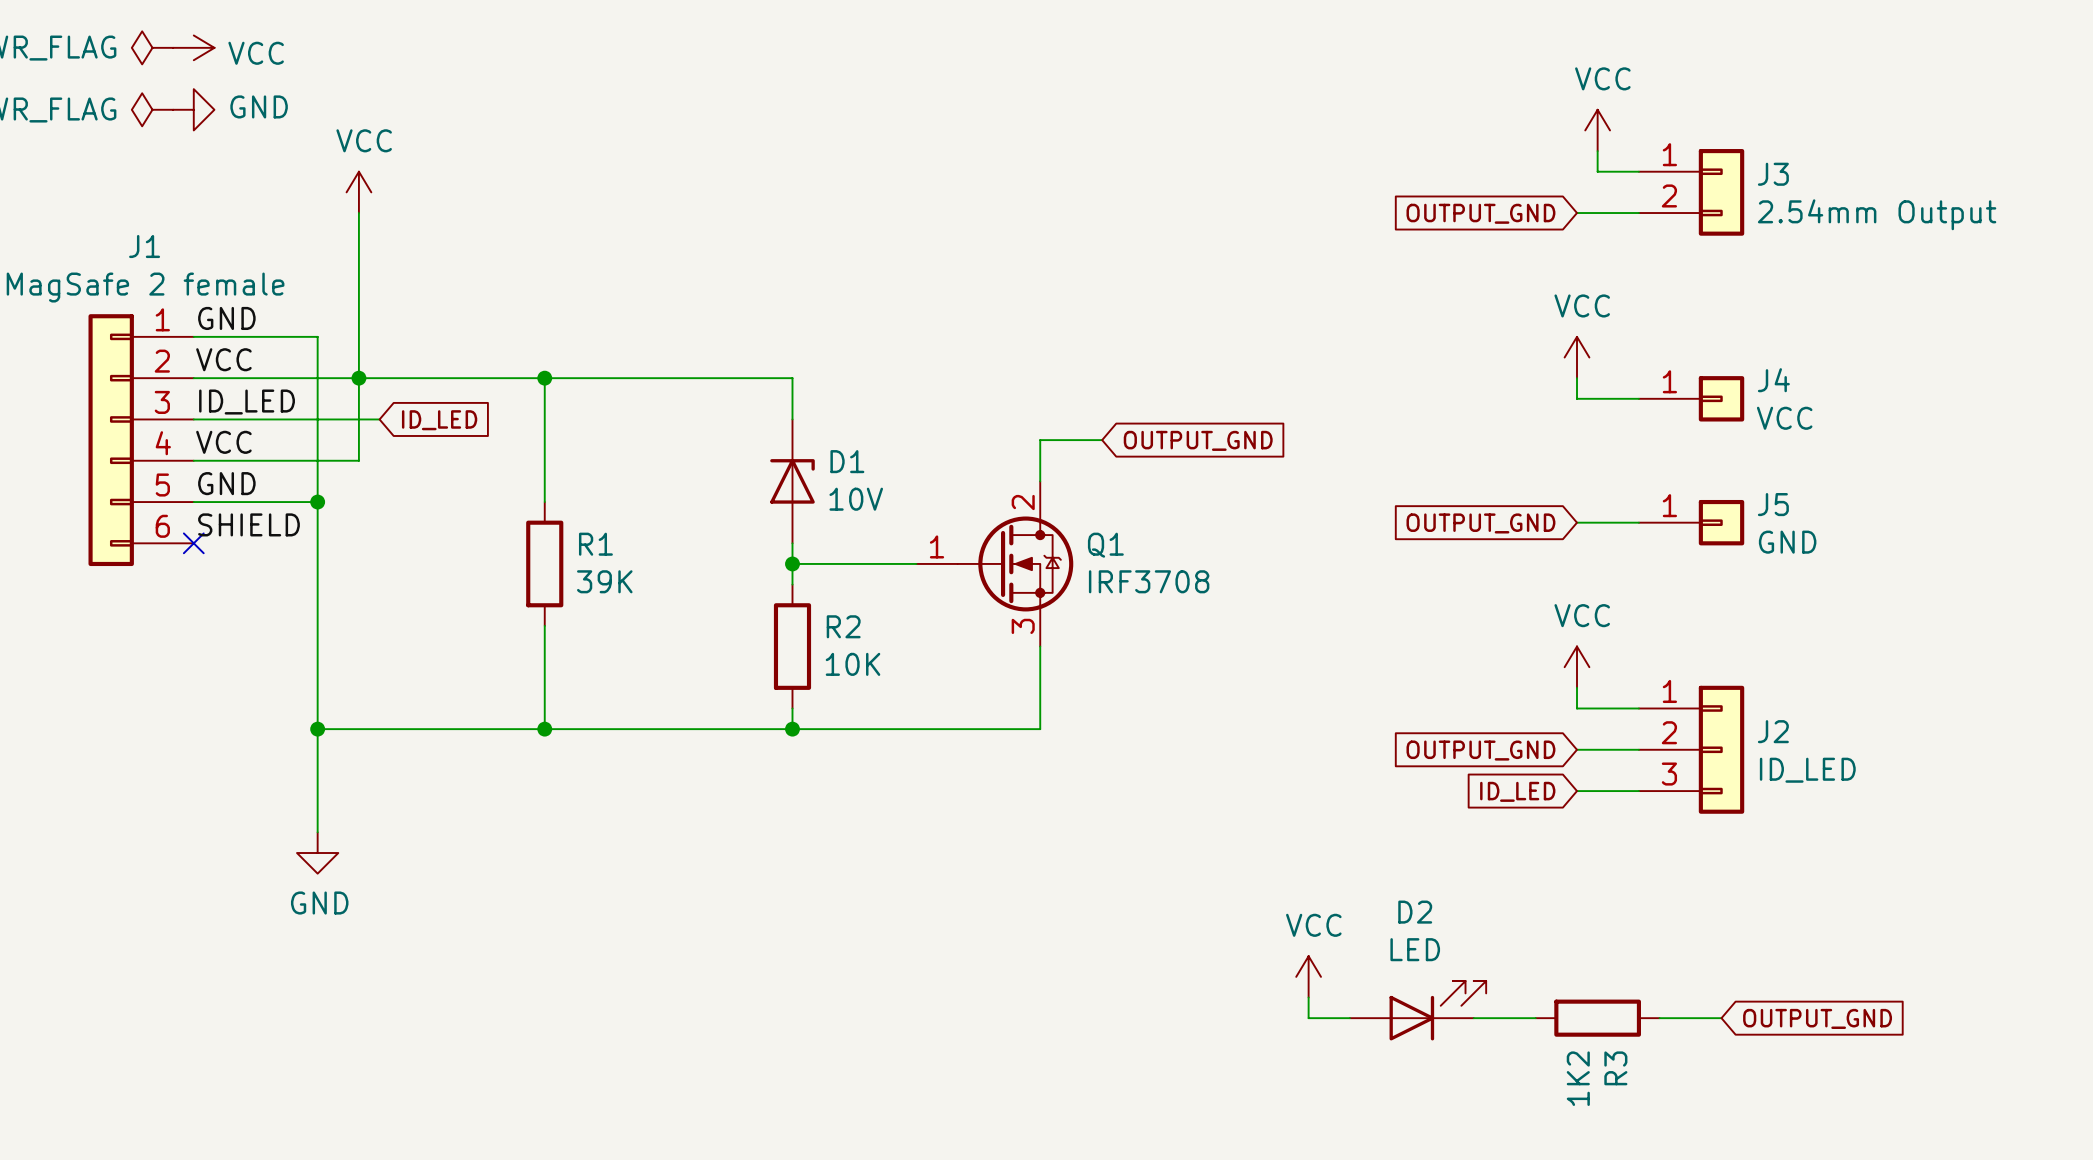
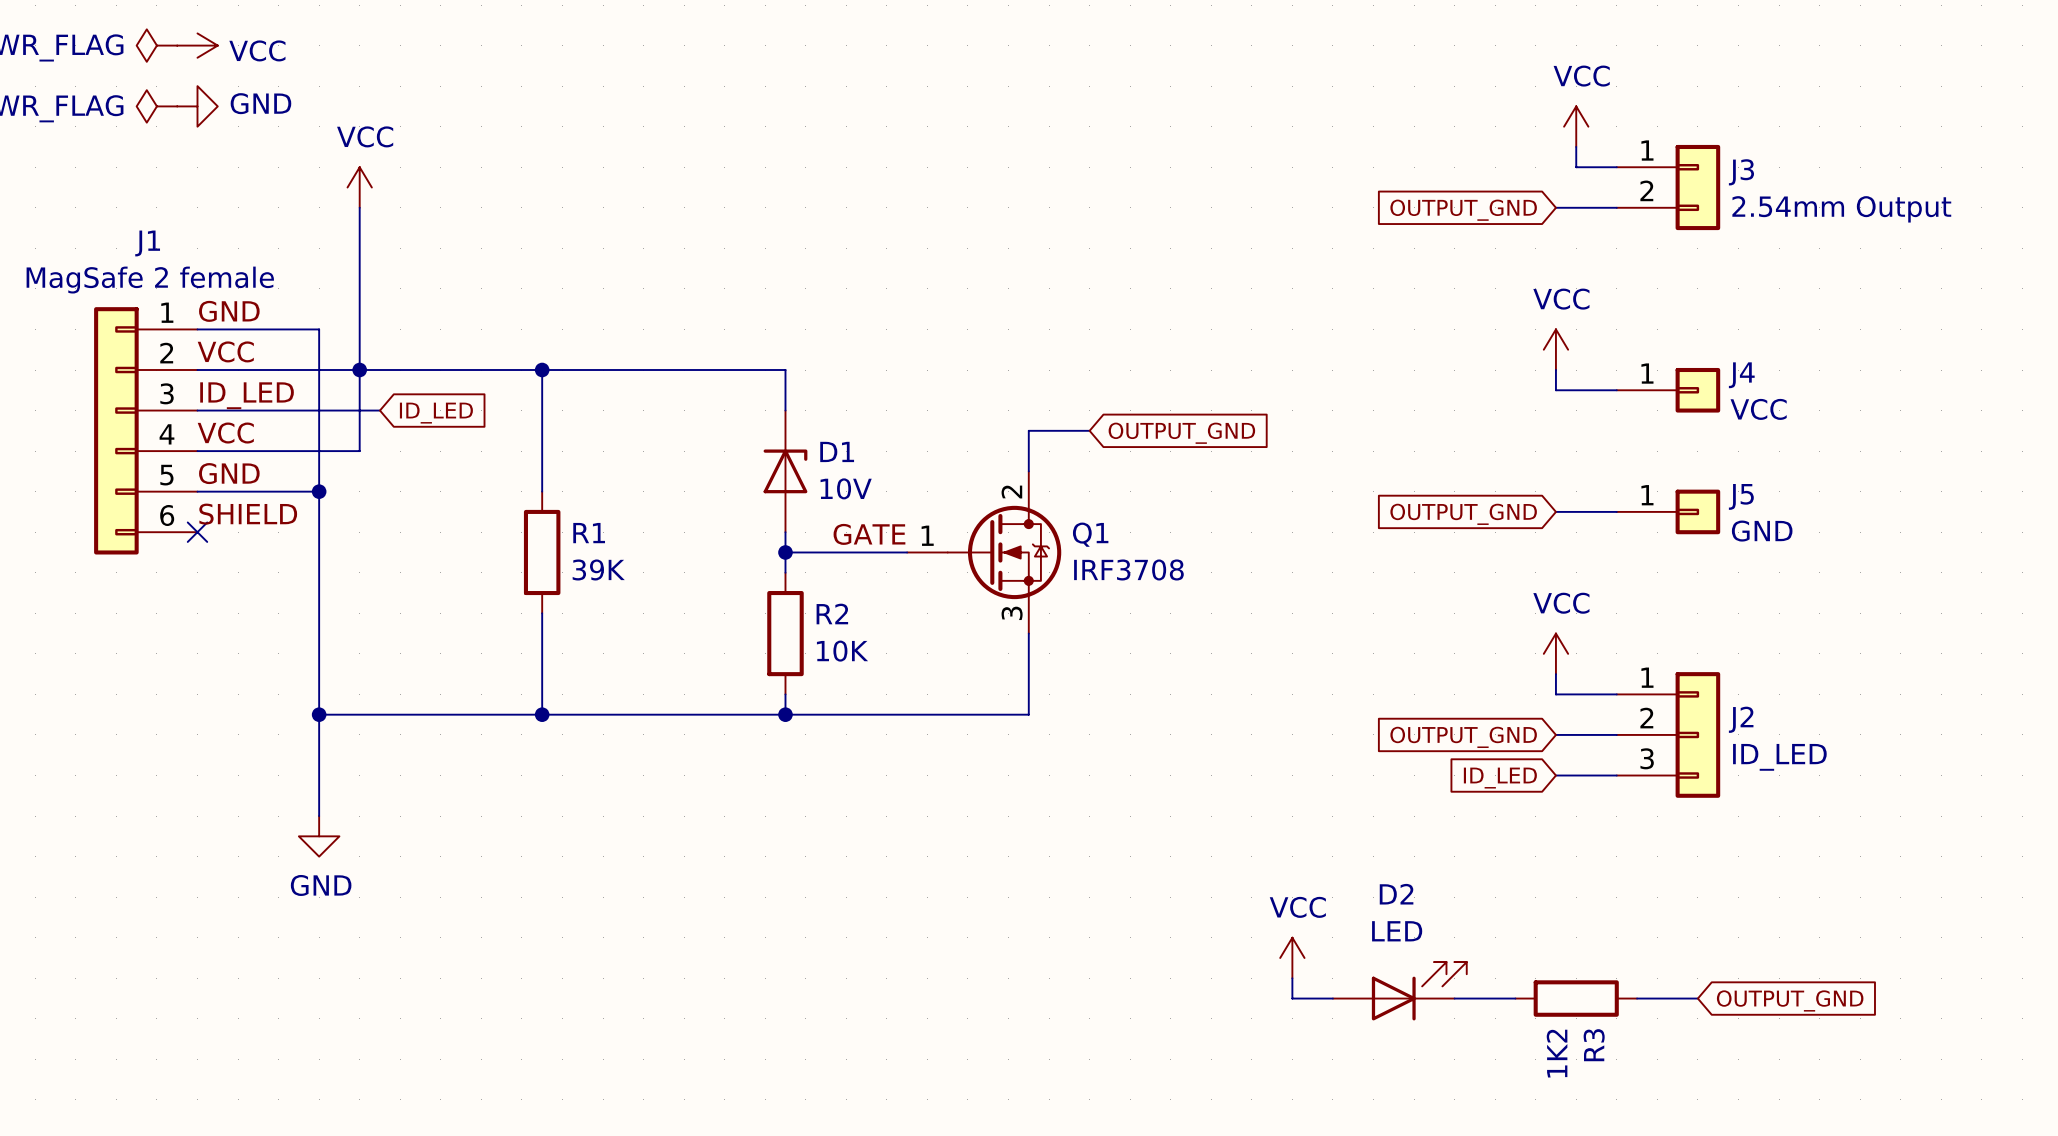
label: none -> GATE (869, 534)

